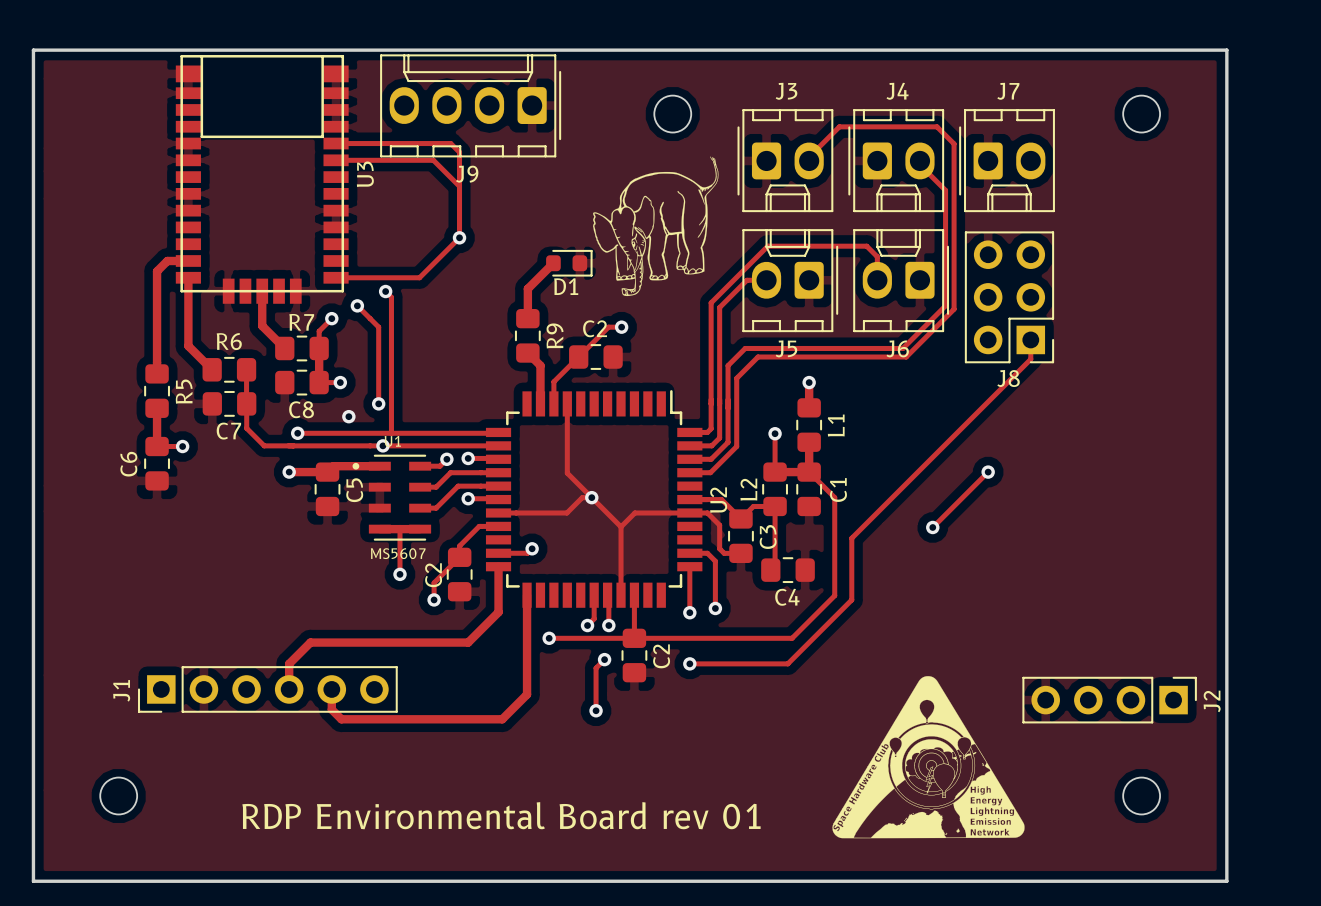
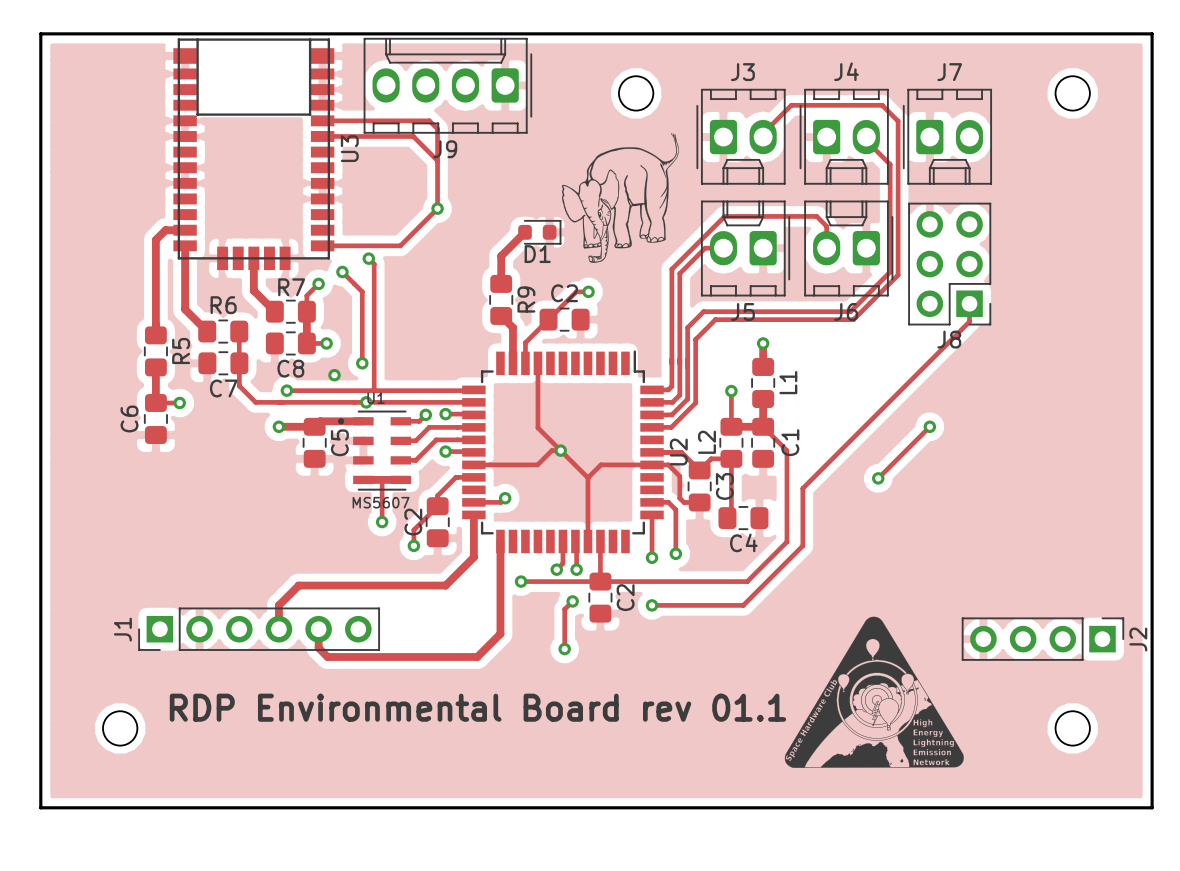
text: RDP Environmental Board rev 01 (501, 815) -> RDP Environmental Board rev 01.1 (477, 707)

